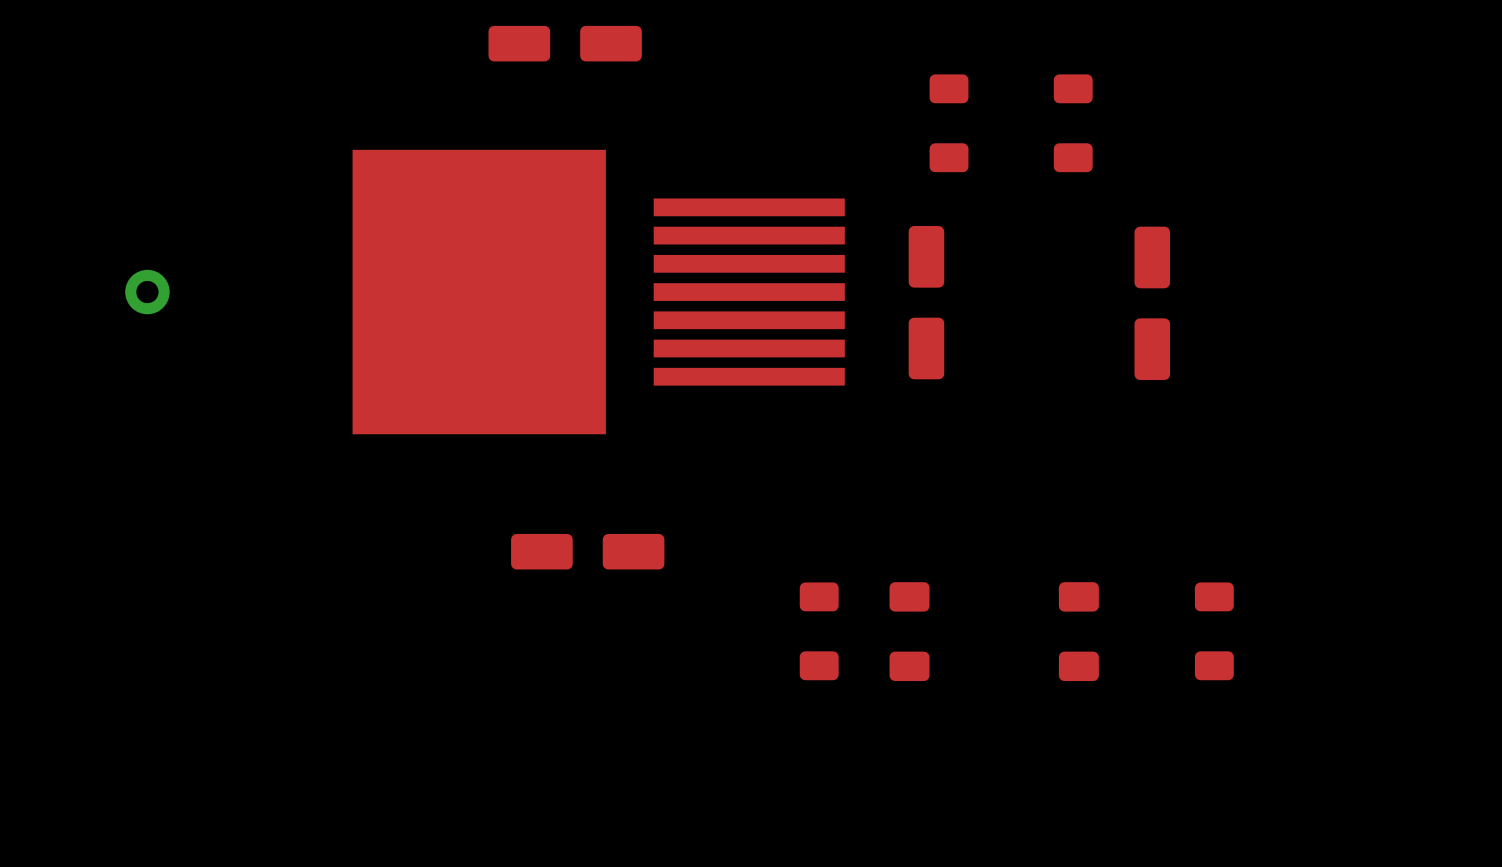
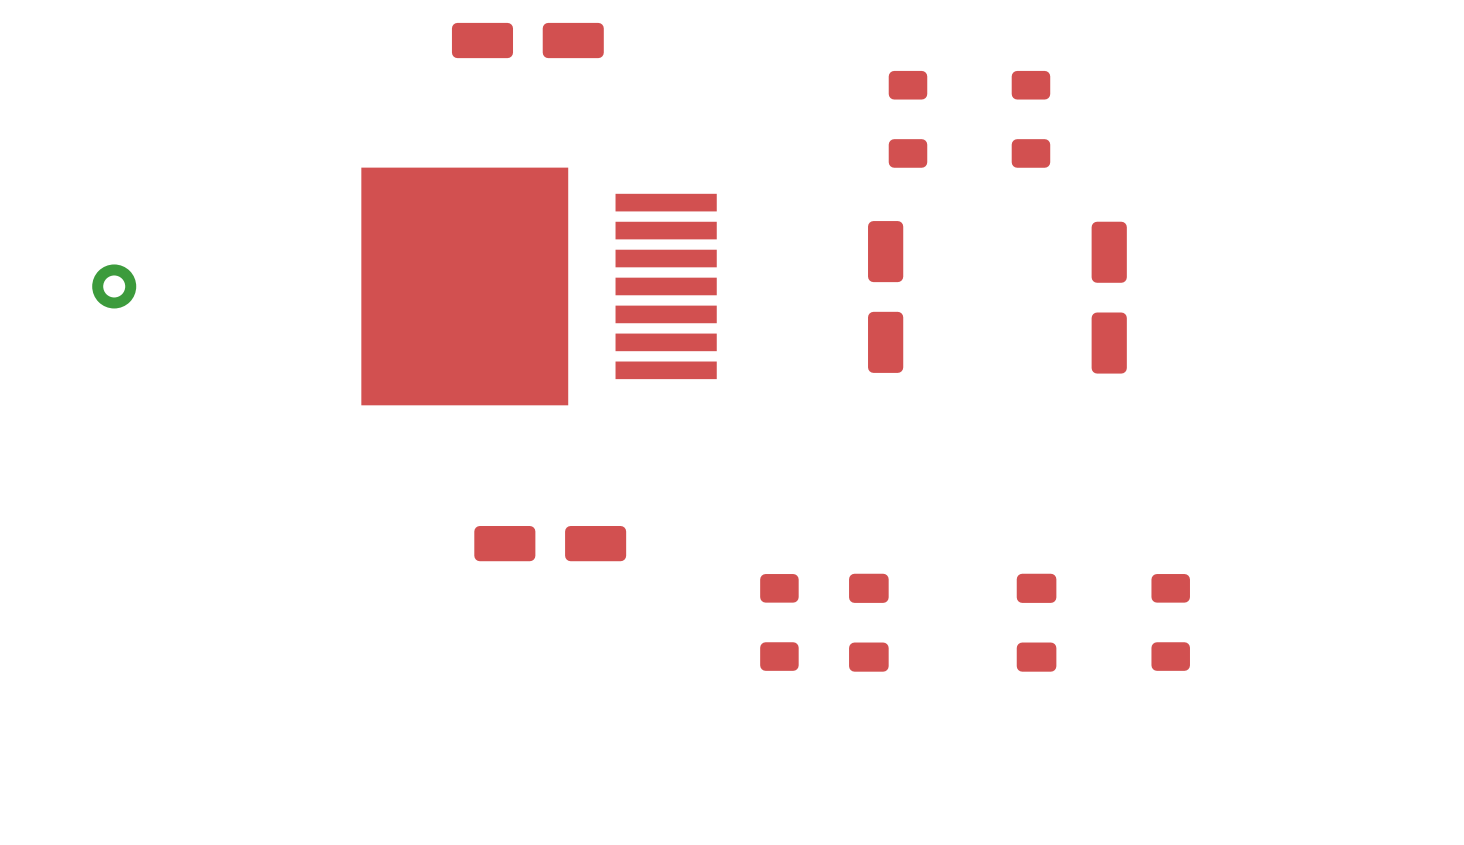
part footprint: [352, 149, 845, 435] -> [361, 167, 717, 406]

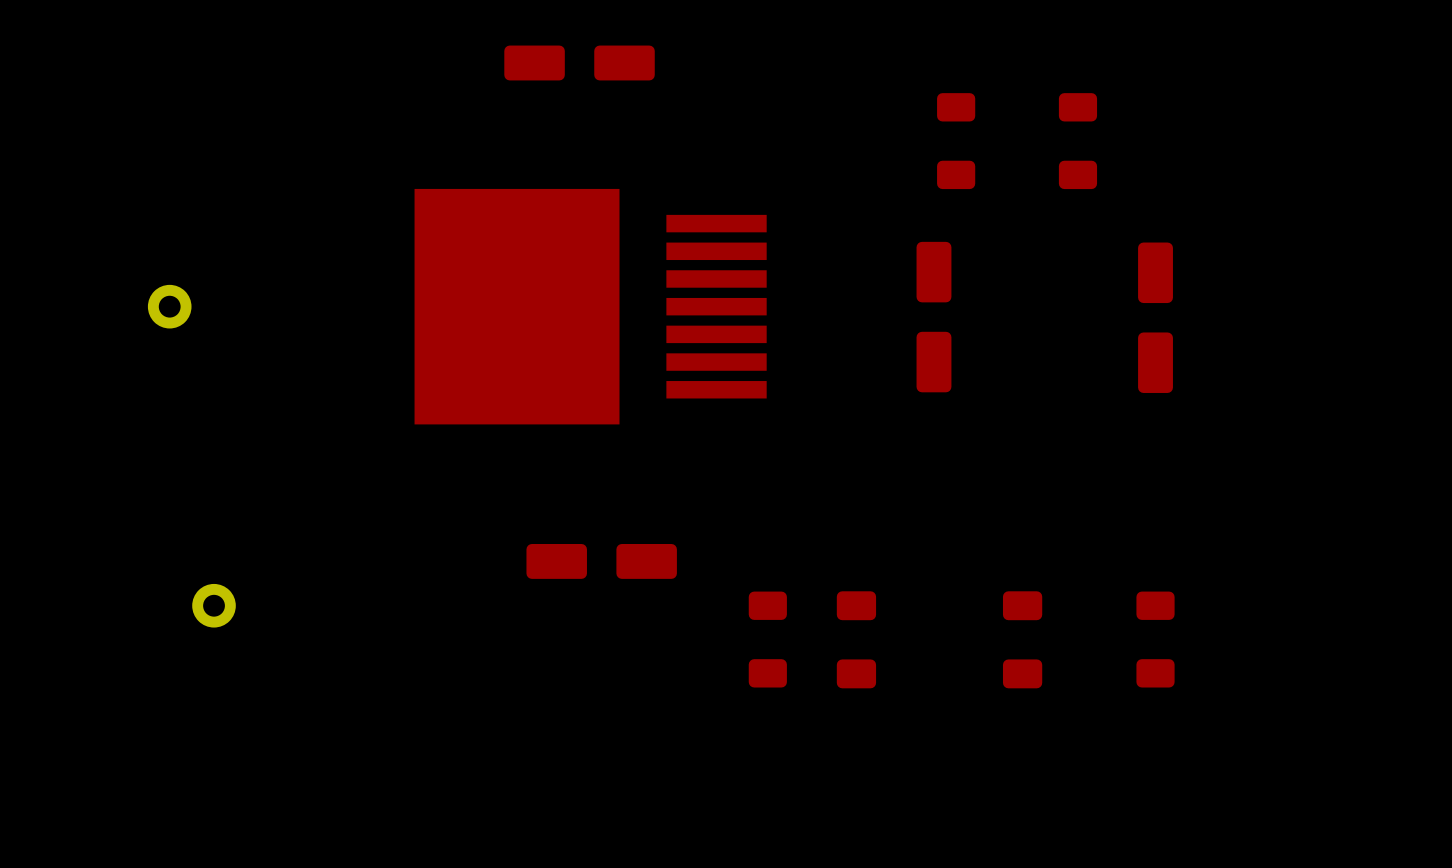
part: none -> (214, 605)
part position: (779, 622) -> (767, 639)
part: none -> (856, 639)
part: (868, 622) -> none
part: none -> (1022, 639)
part: (1036, 622) -> none
part position: (1170, 622) -> (1155, 639)

